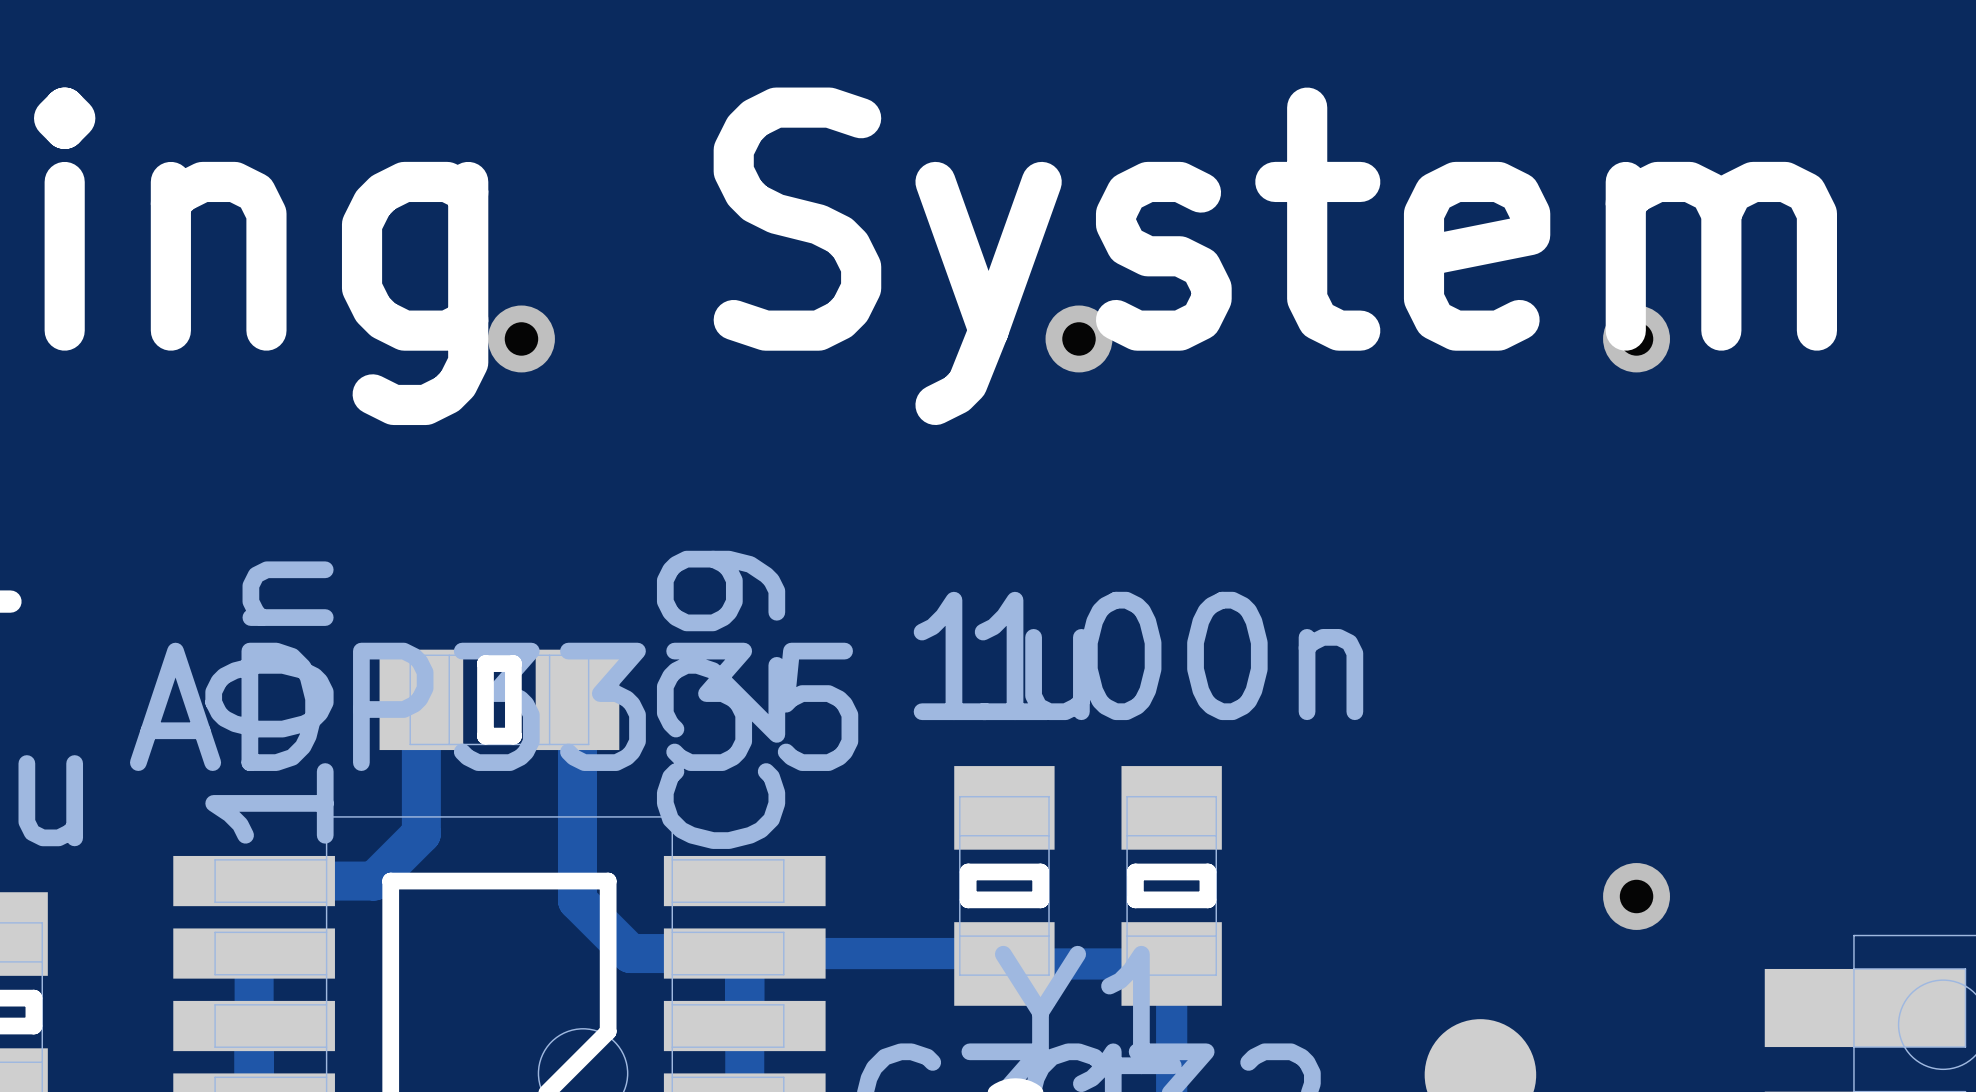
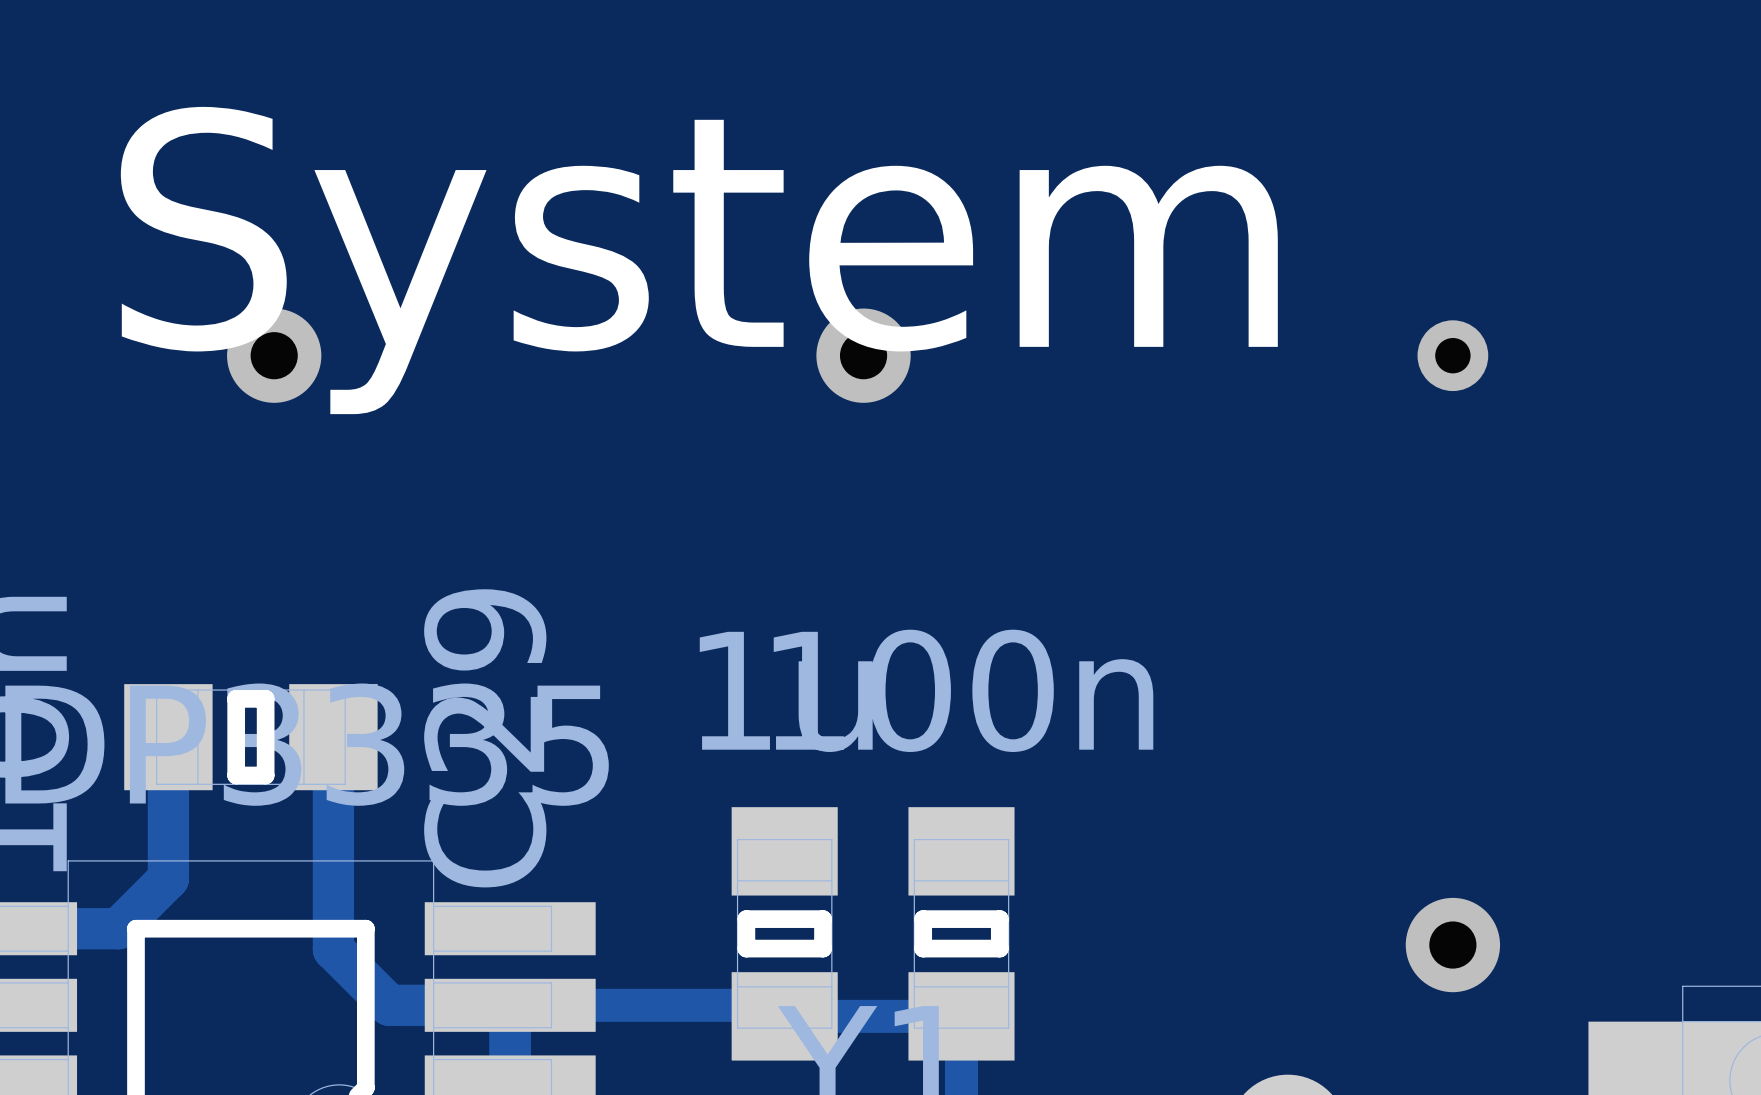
via size: [488, 305, 555, 373] -> [227, 308, 322, 403]
via size: [1045, 305, 1113, 373] -> [816, 308, 911, 403]
via size: [1603, 863, 1670, 930] -> [1405, 897, 1501, 993]

